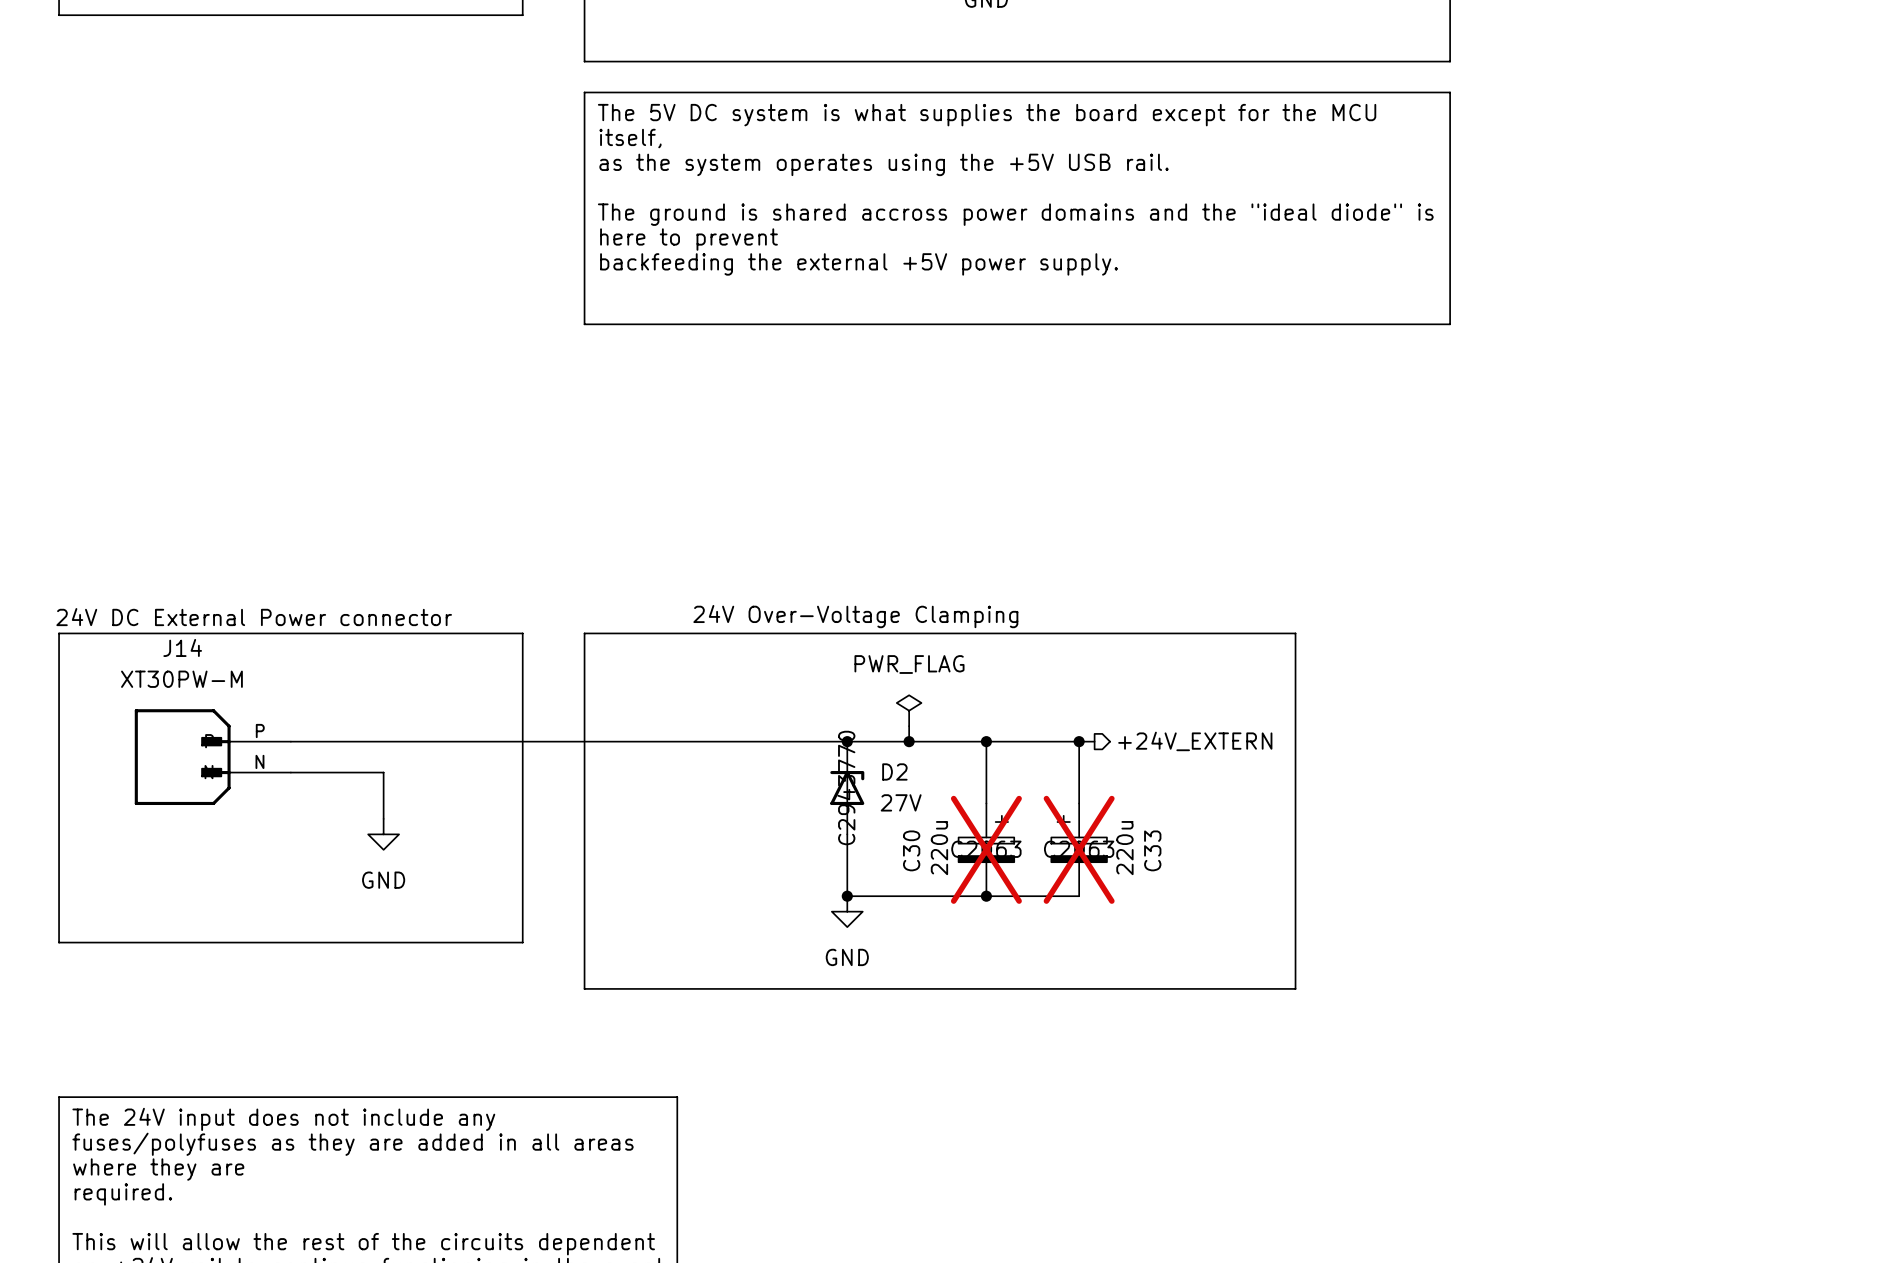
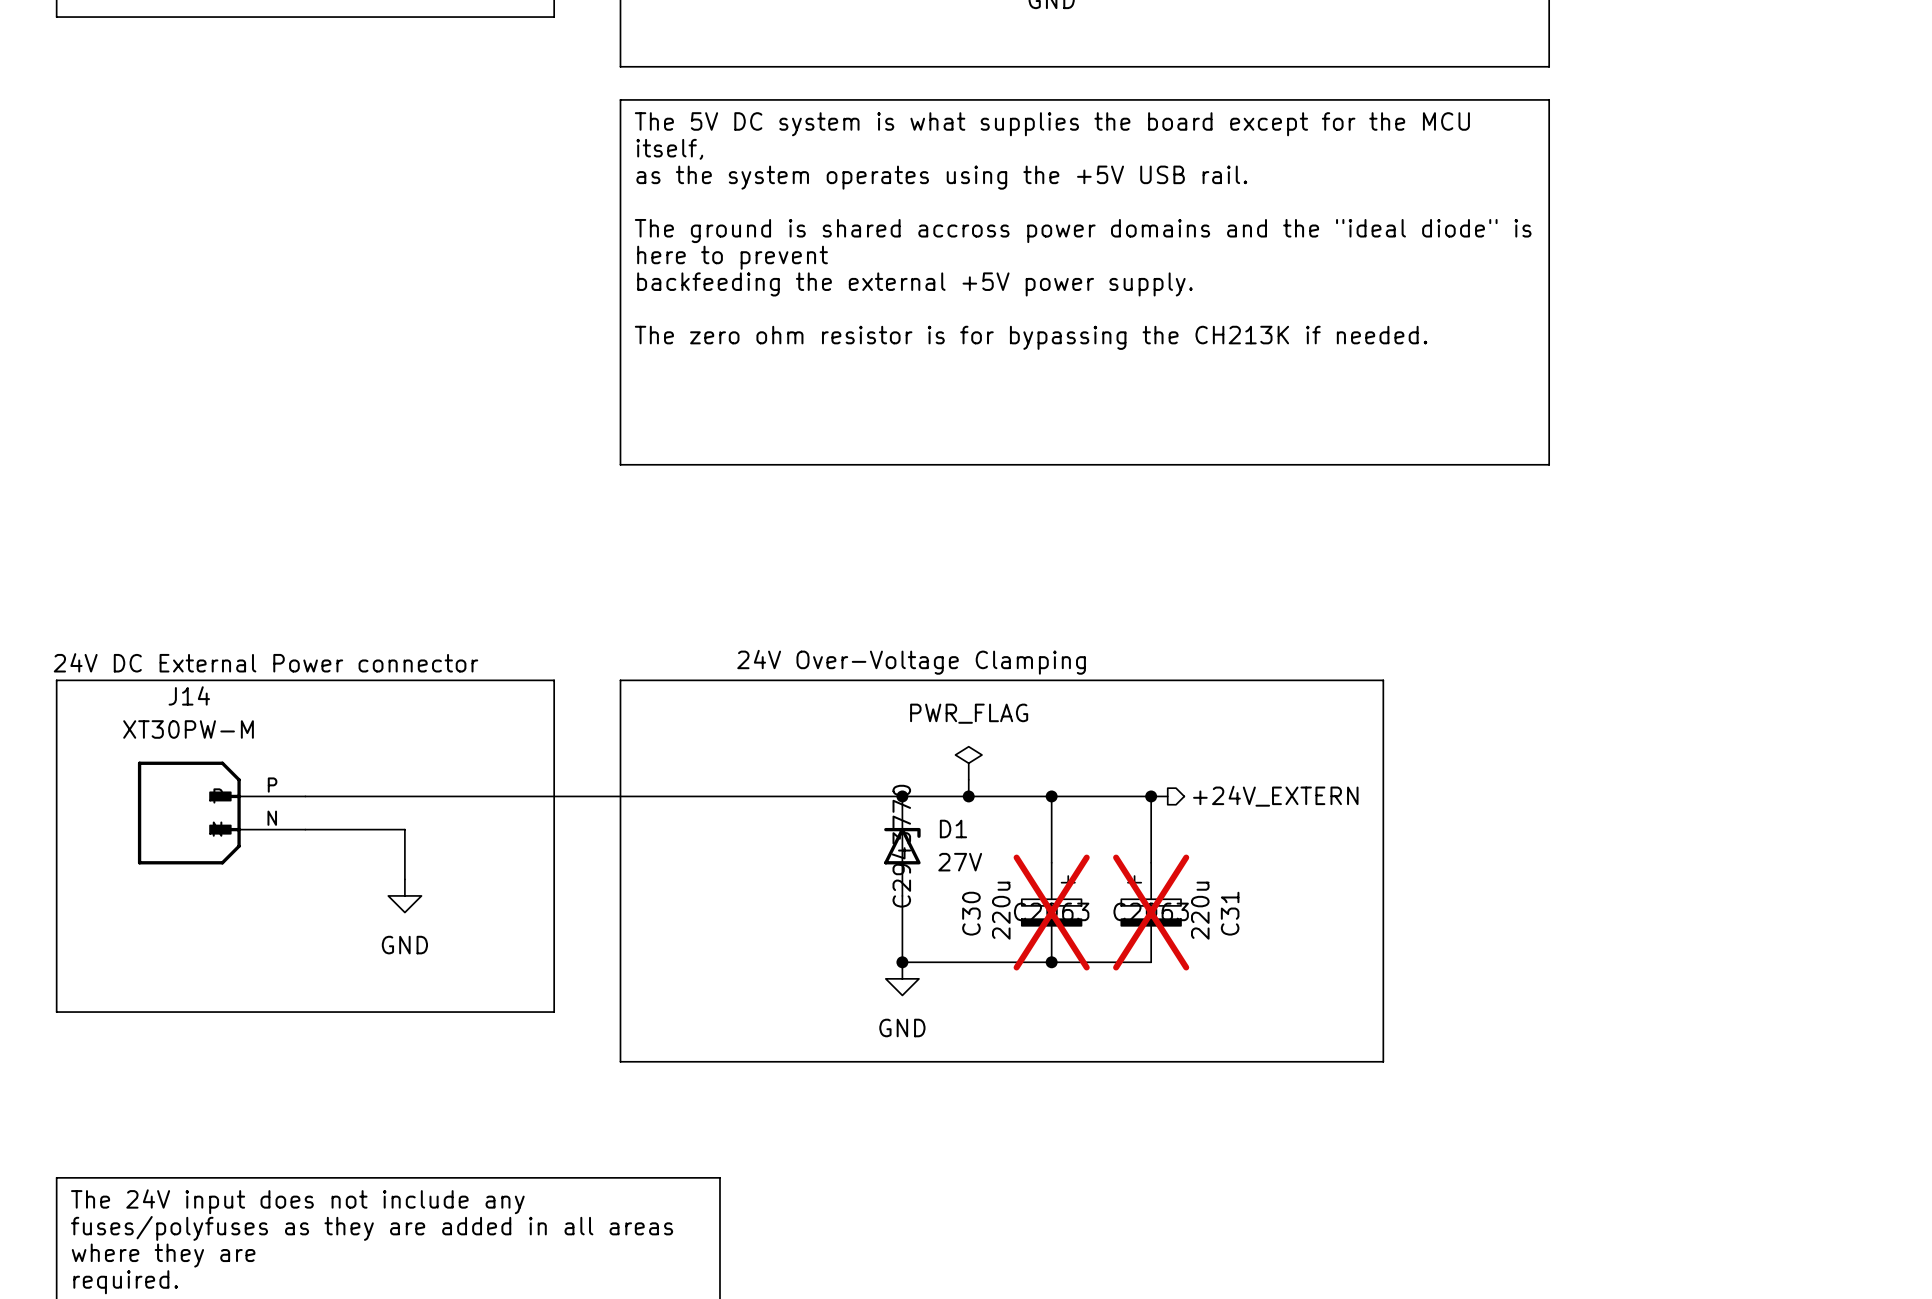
text: none -> The zero ohm resistor is for bypassing the CH213K if needed. (1031, 337)
line: (584, 324) (1450, 324) -> (620, 348) (620, 464) (1549, 464) (1549, 348)
D2 name: D2 (894, 771) -> D1 (953, 828)
C33 name: C33 (1152, 850) -> C31 (1230, 913)

